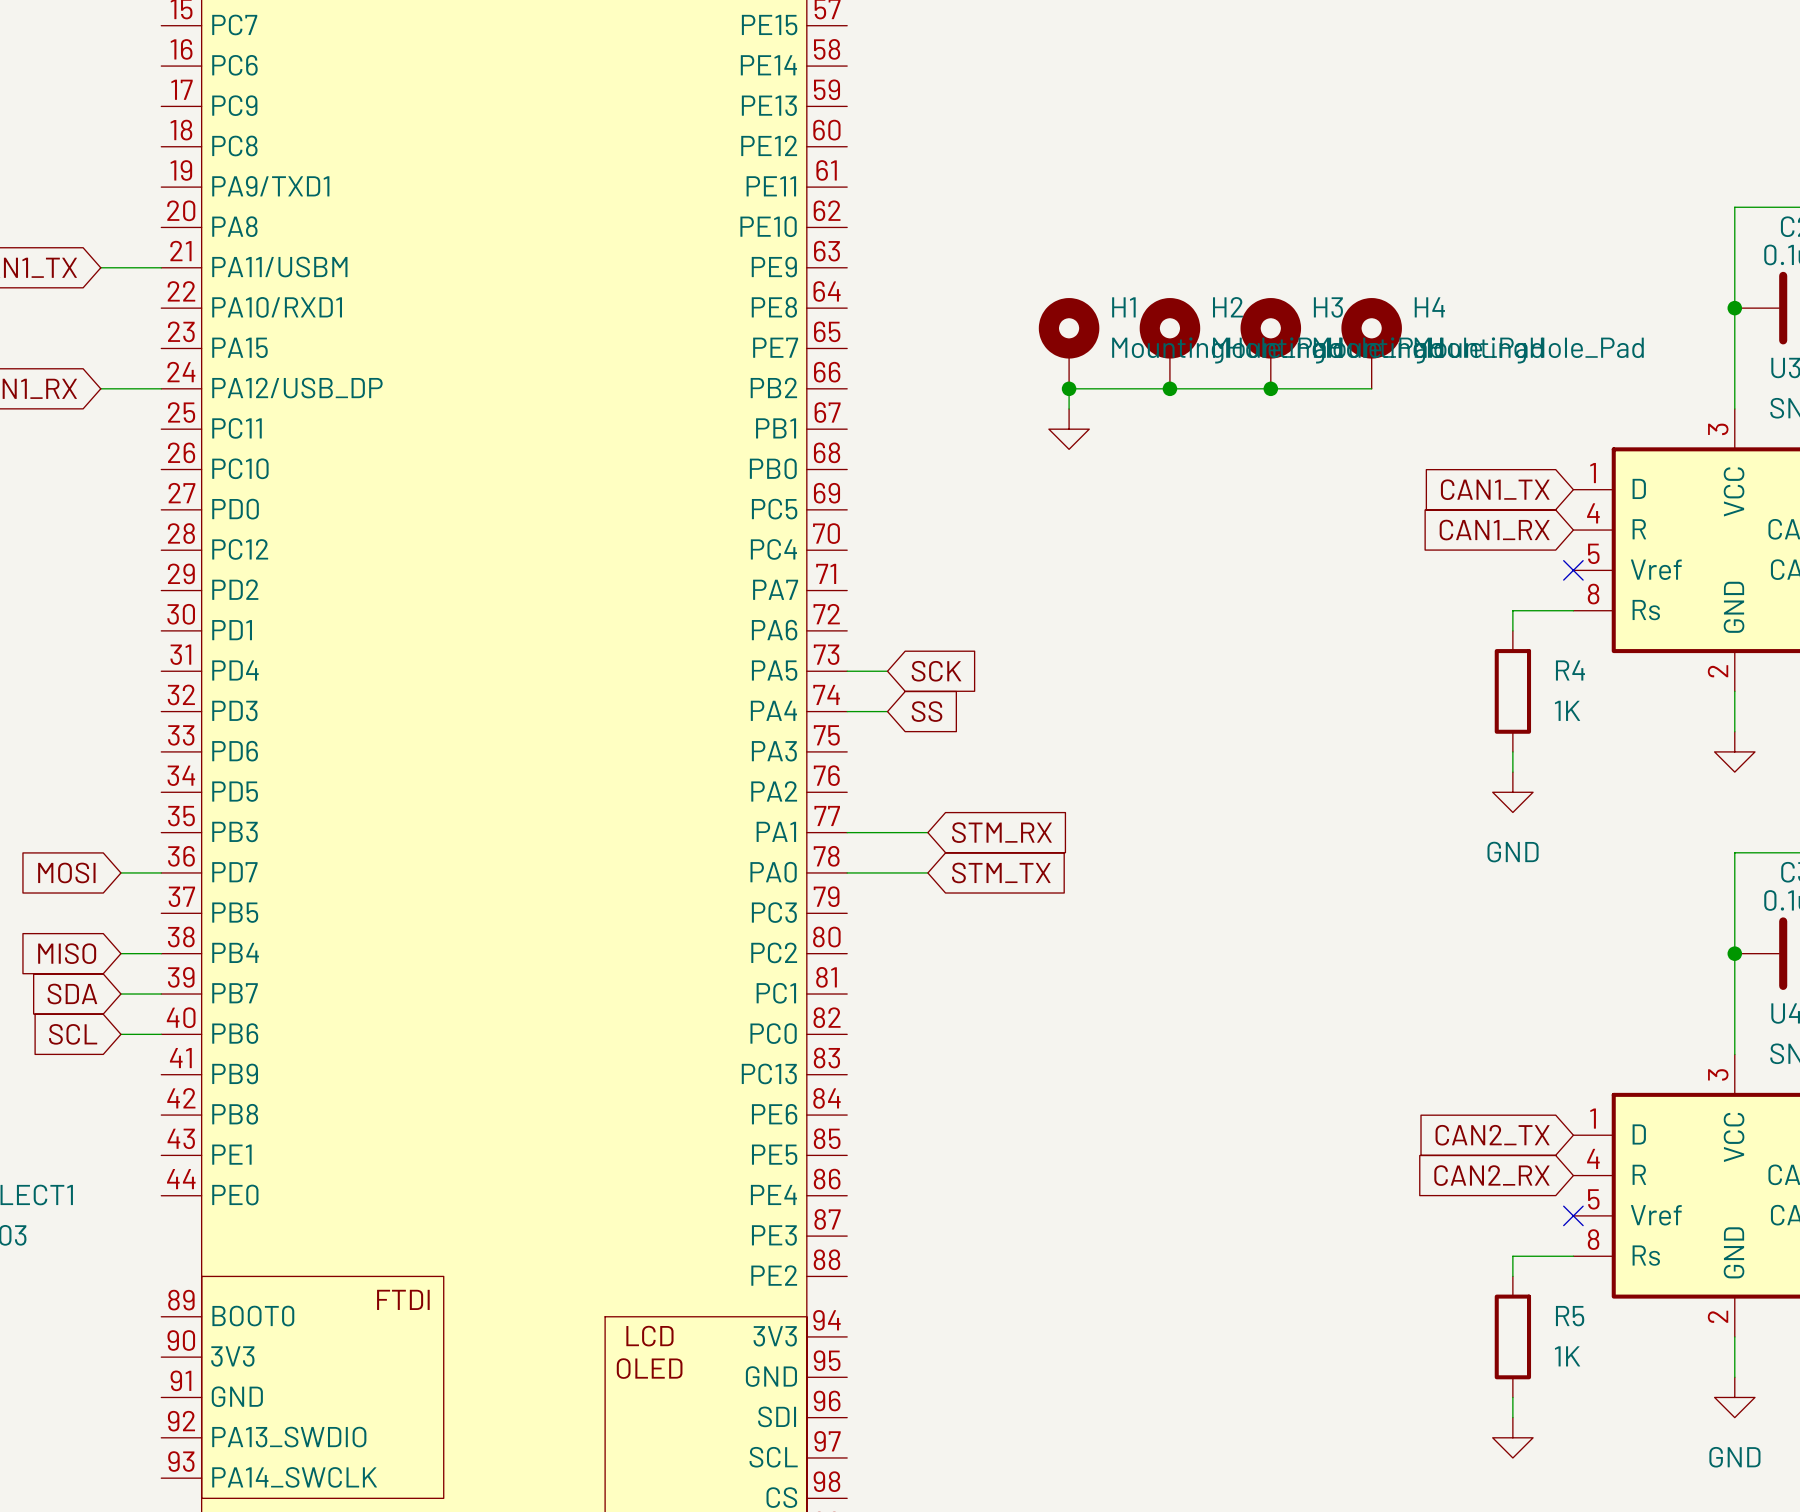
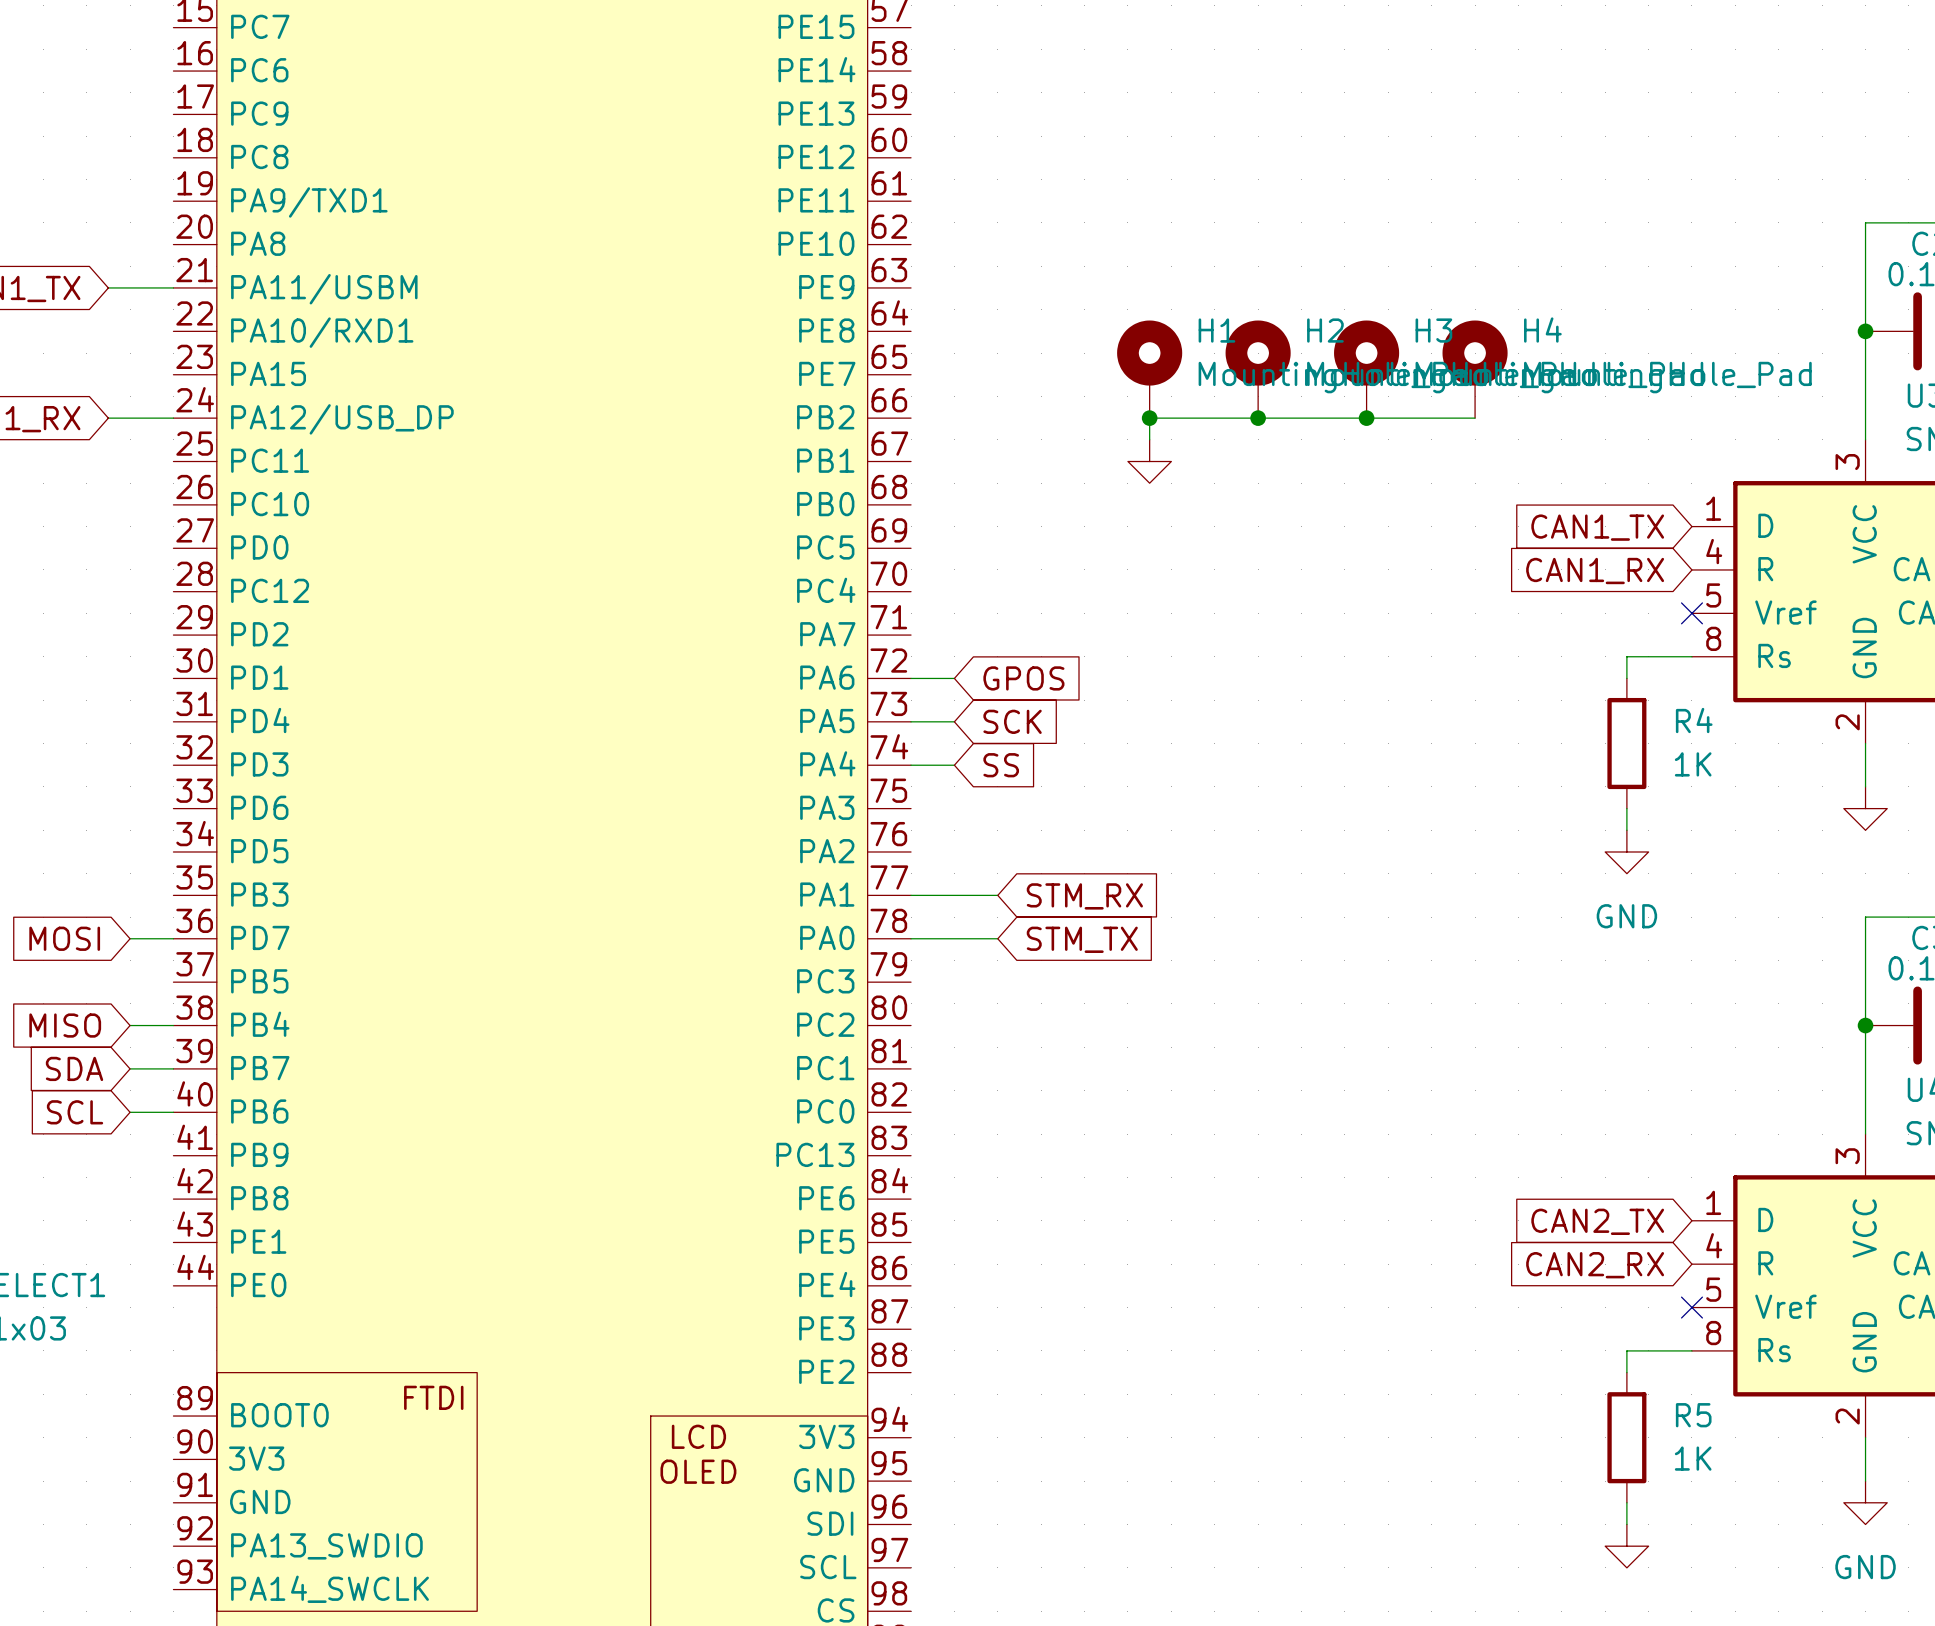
wire: none -> (911, 678) (954, 678)
global label: none -> GPOS (1023, 678)

